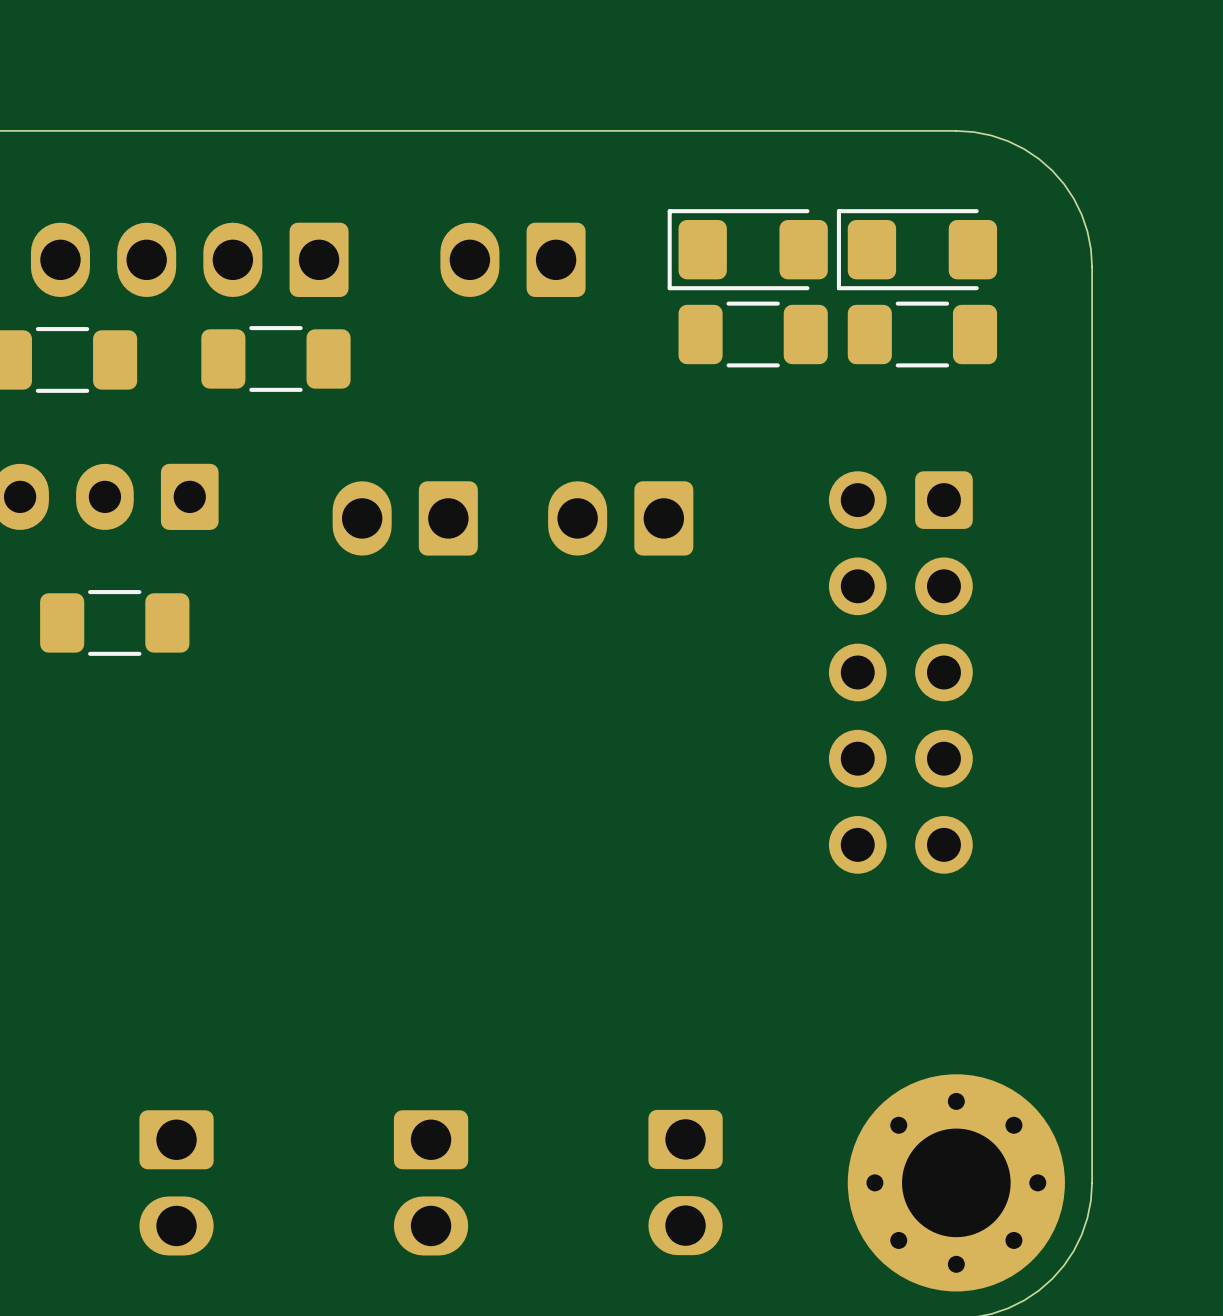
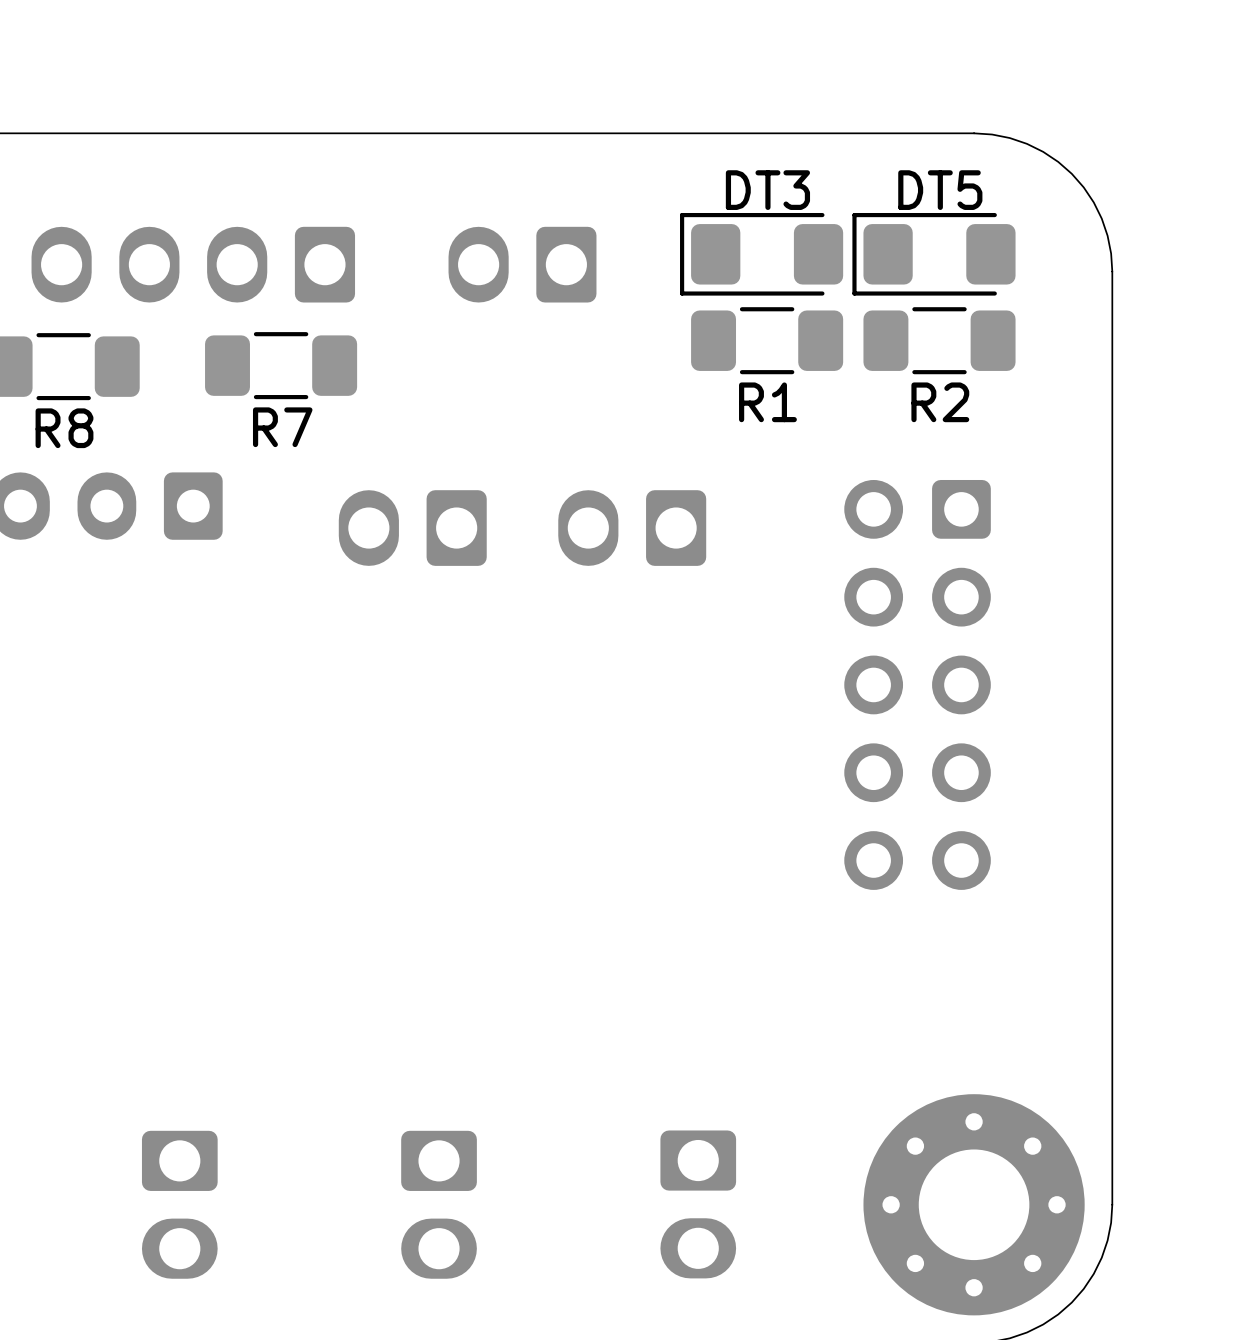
DT3 name: none -> DT3 (767, 190)
DT5 name: none -> DT5 (940, 190)
R1 name: none -> R1 (767, 402)
R2 name: none -> R2 (940, 402)
R7 name: none -> R7 (282, 427)
R8 name: none -> R8 (64, 428)
part: (114, 622) -> none

